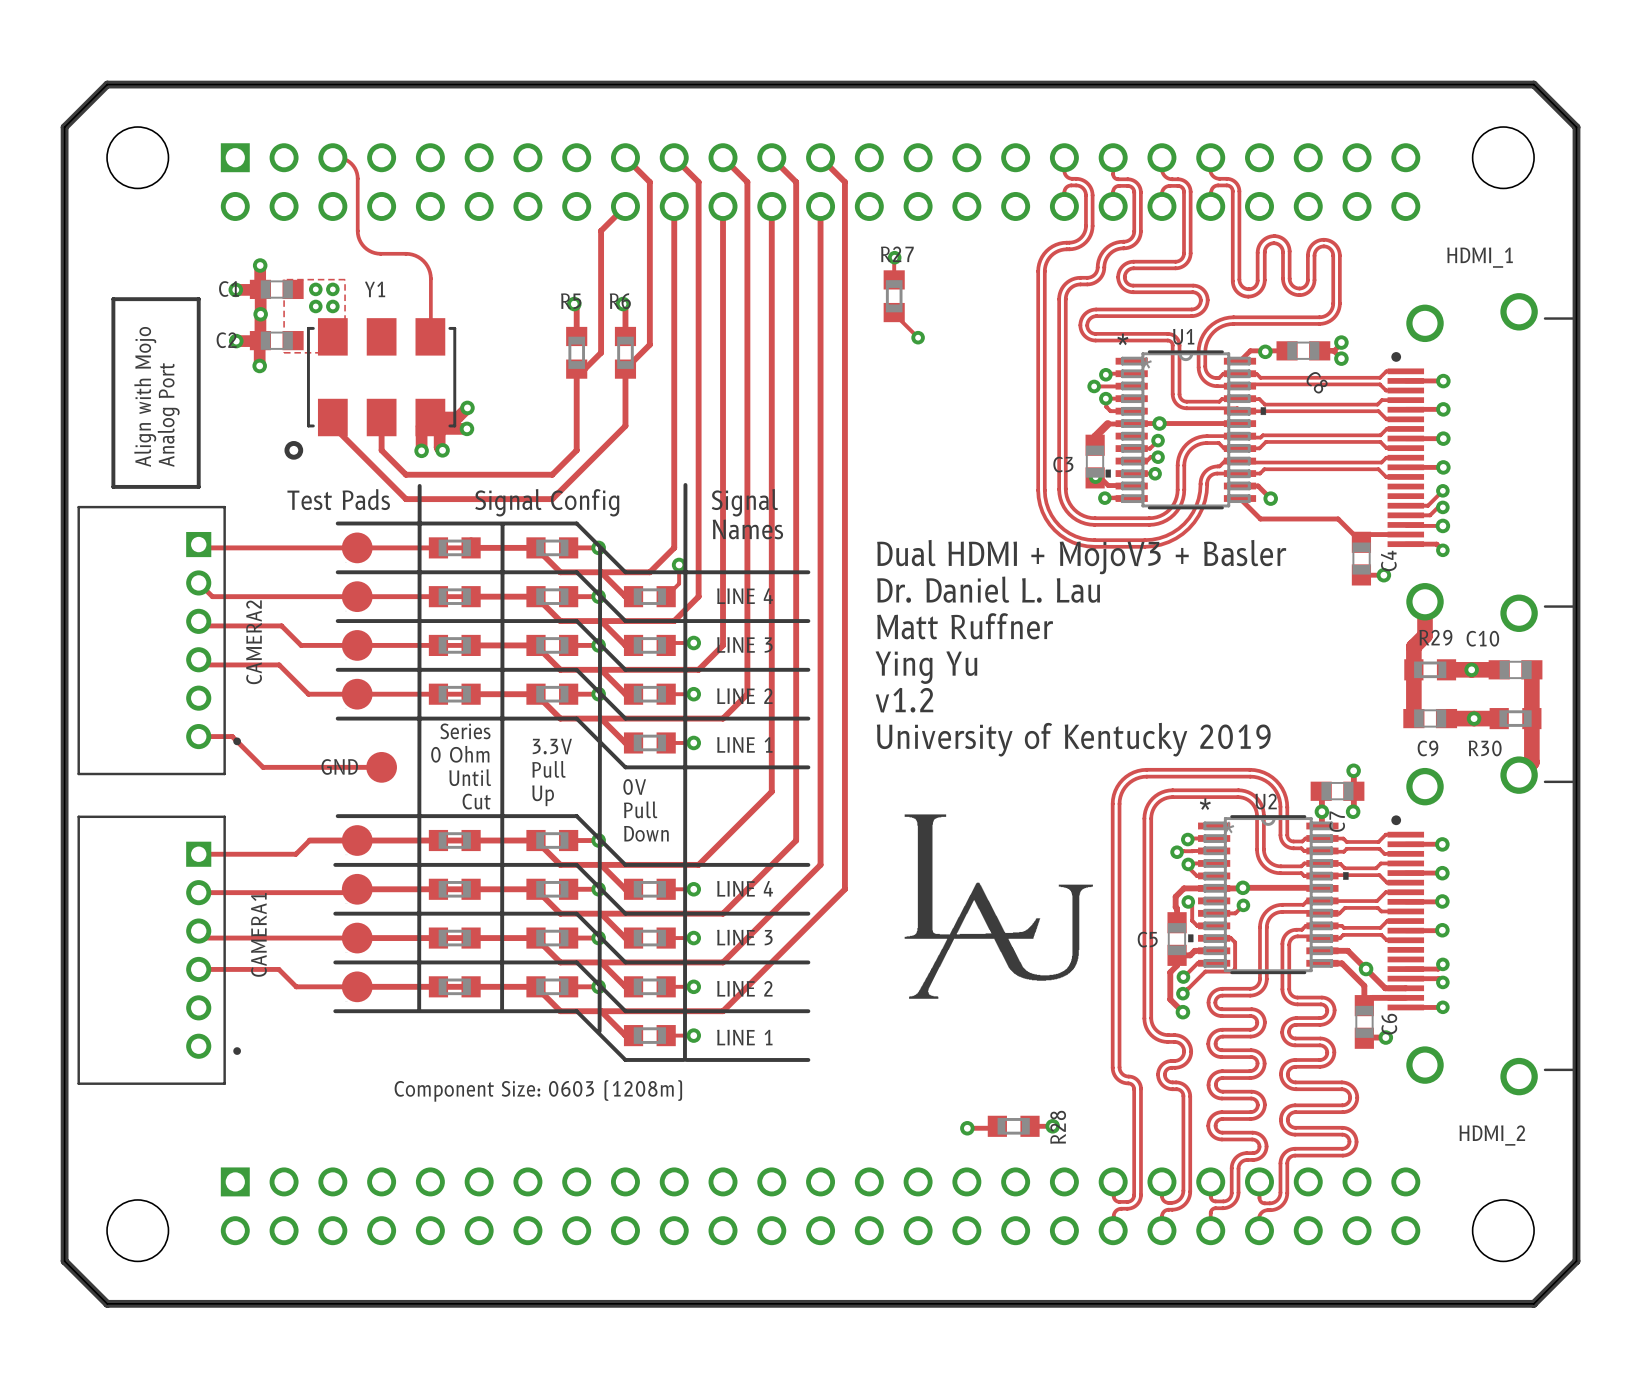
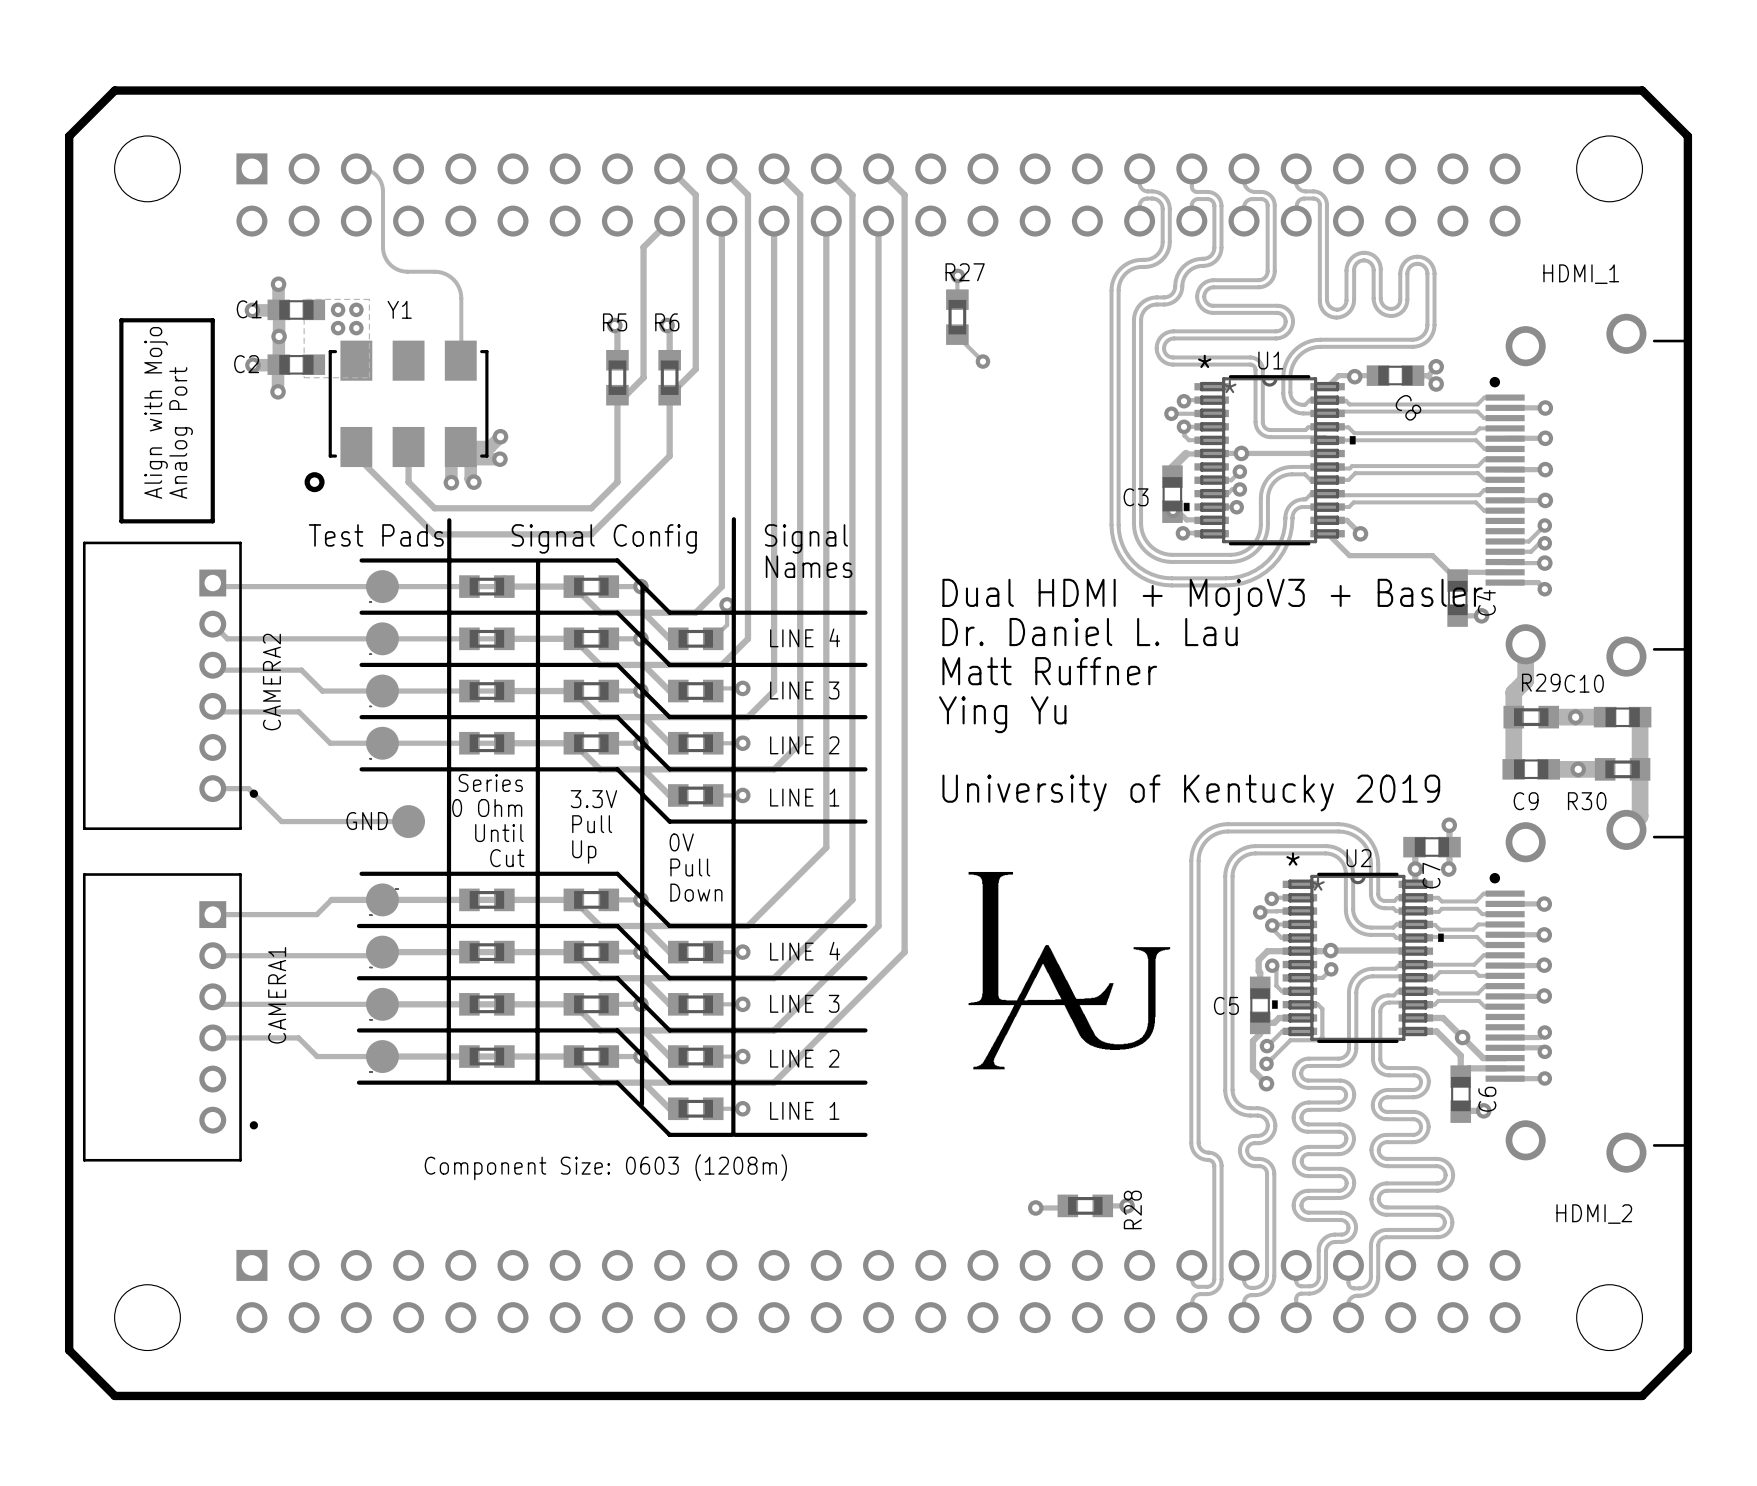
text: v1.2 (904, 700) -> none

